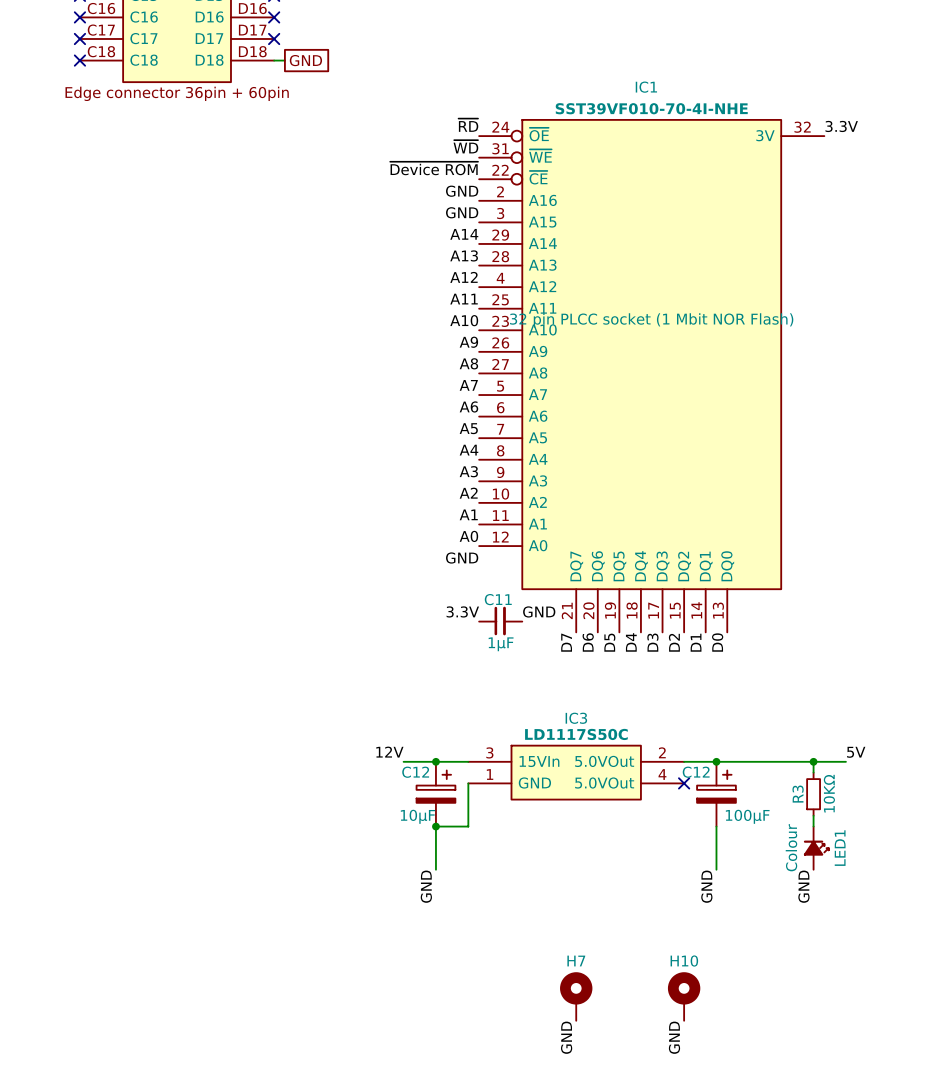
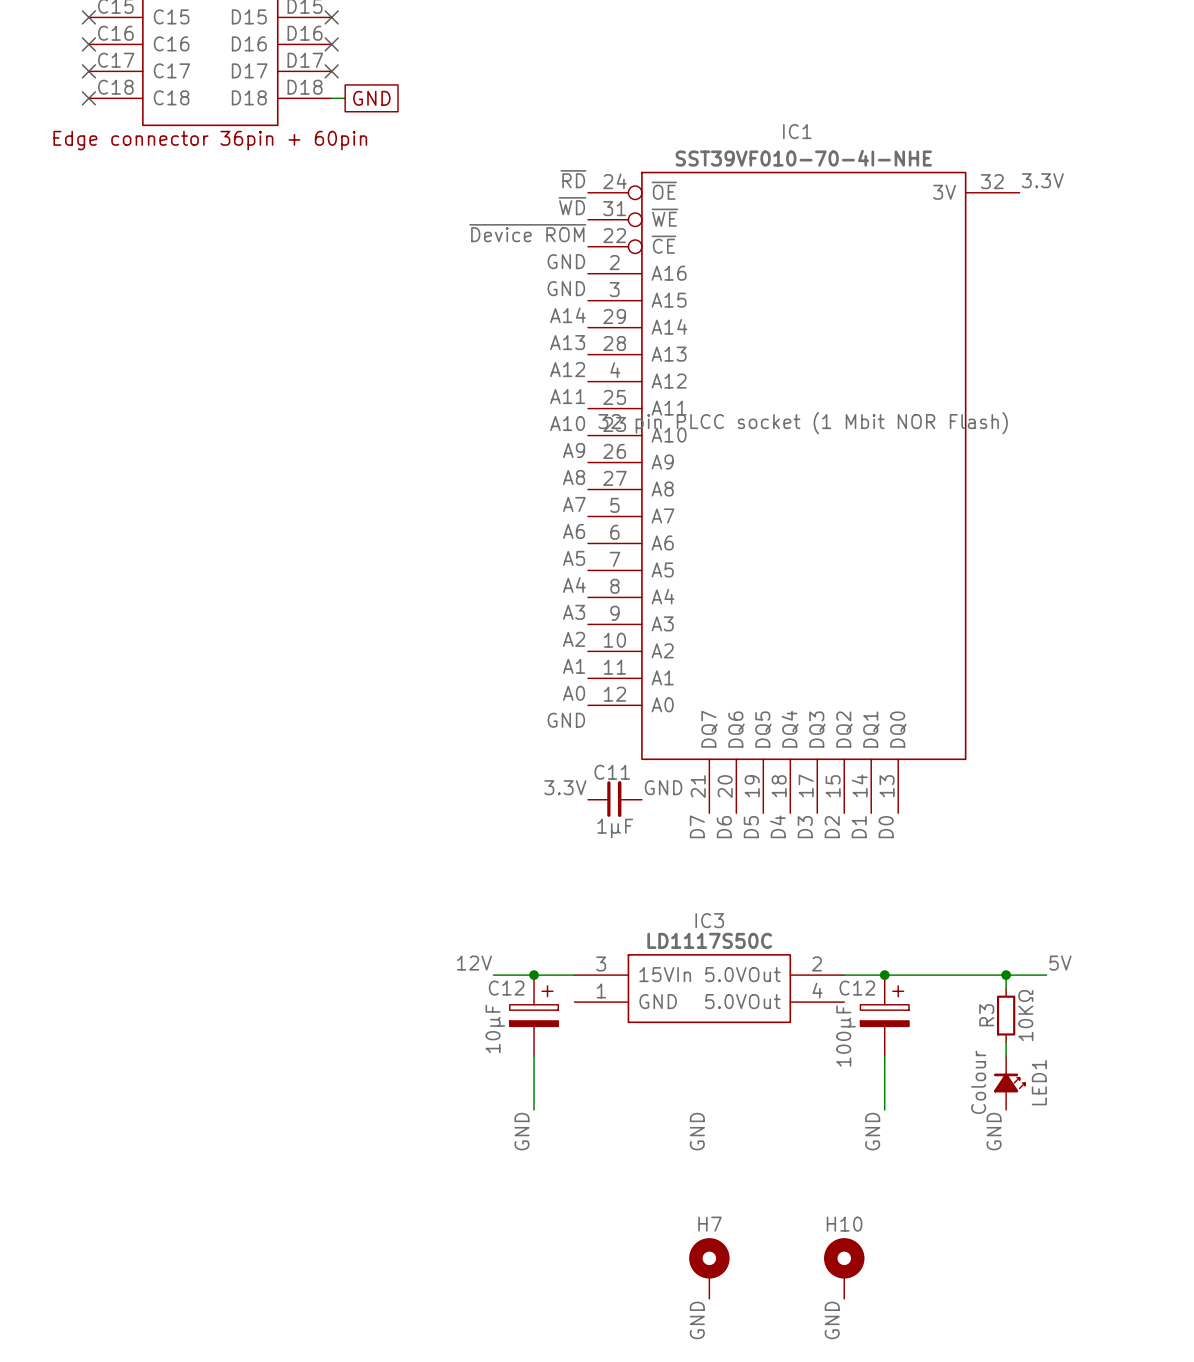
wire: (468, 783) (468, 826) (435, 826) -> none
no-connect mark: (684, 783) -> none
C12 value rotation: 0° (417, 816) -> 90° counterclockwise (495, 1028)
C12 value rotation: 0° (747, 816) -> 90° counterclockwise (846, 1036)
junction: (435, 826) -> none
label: none -> GND (697, 1131)

